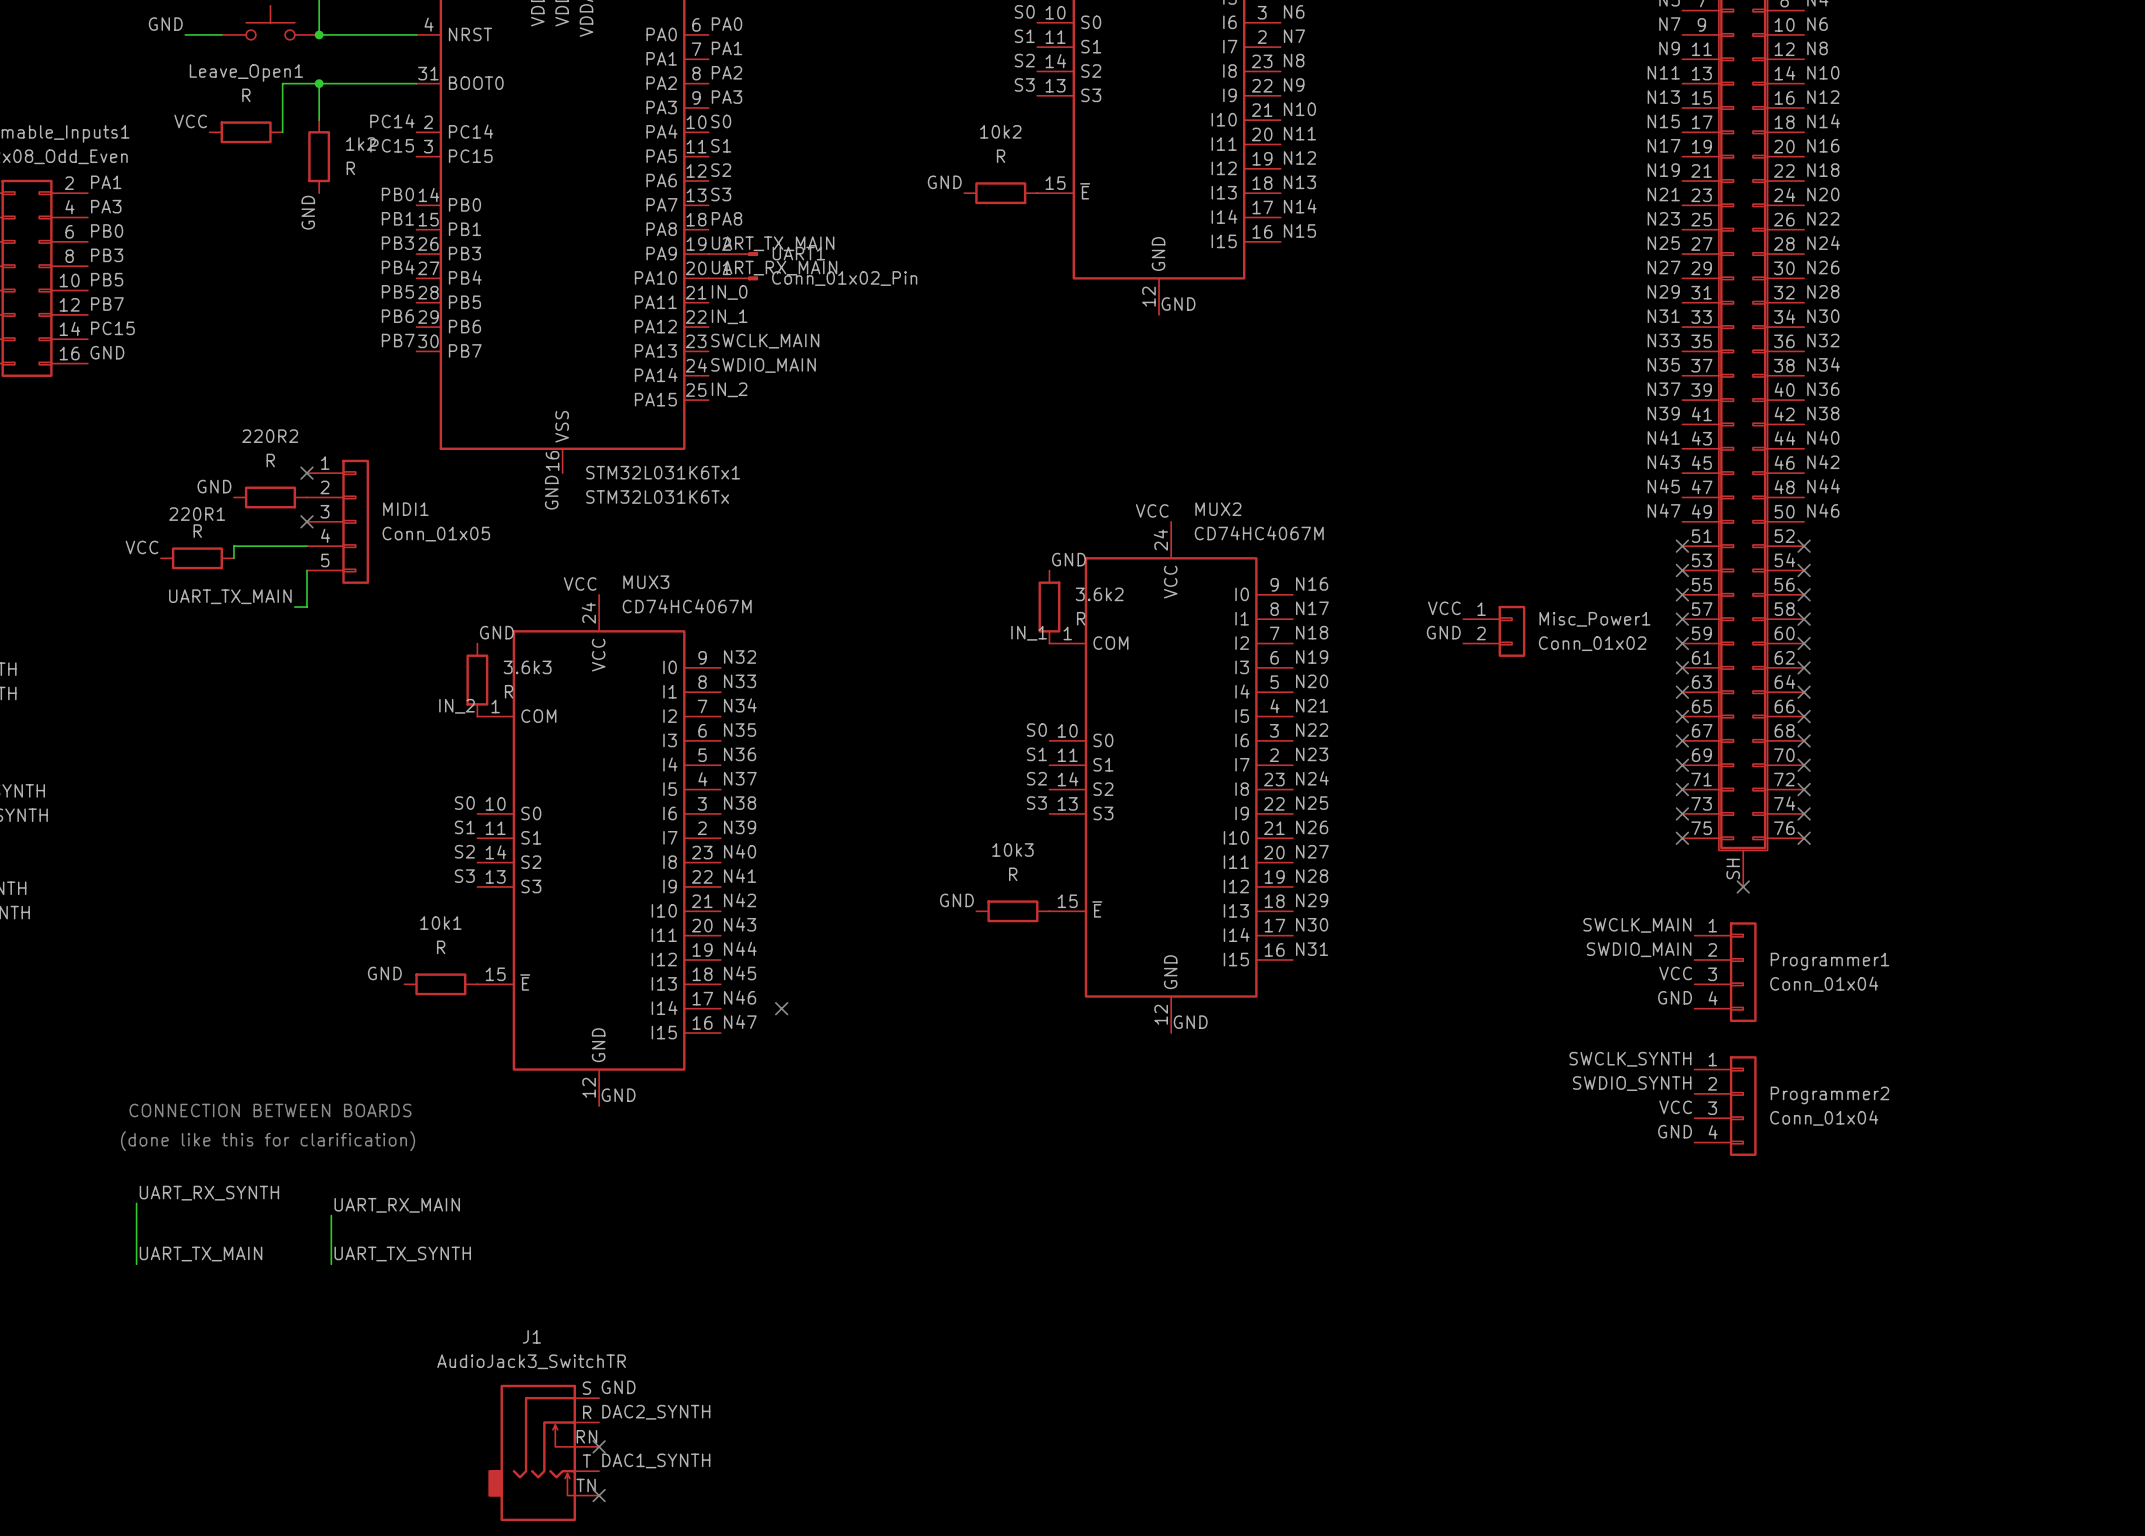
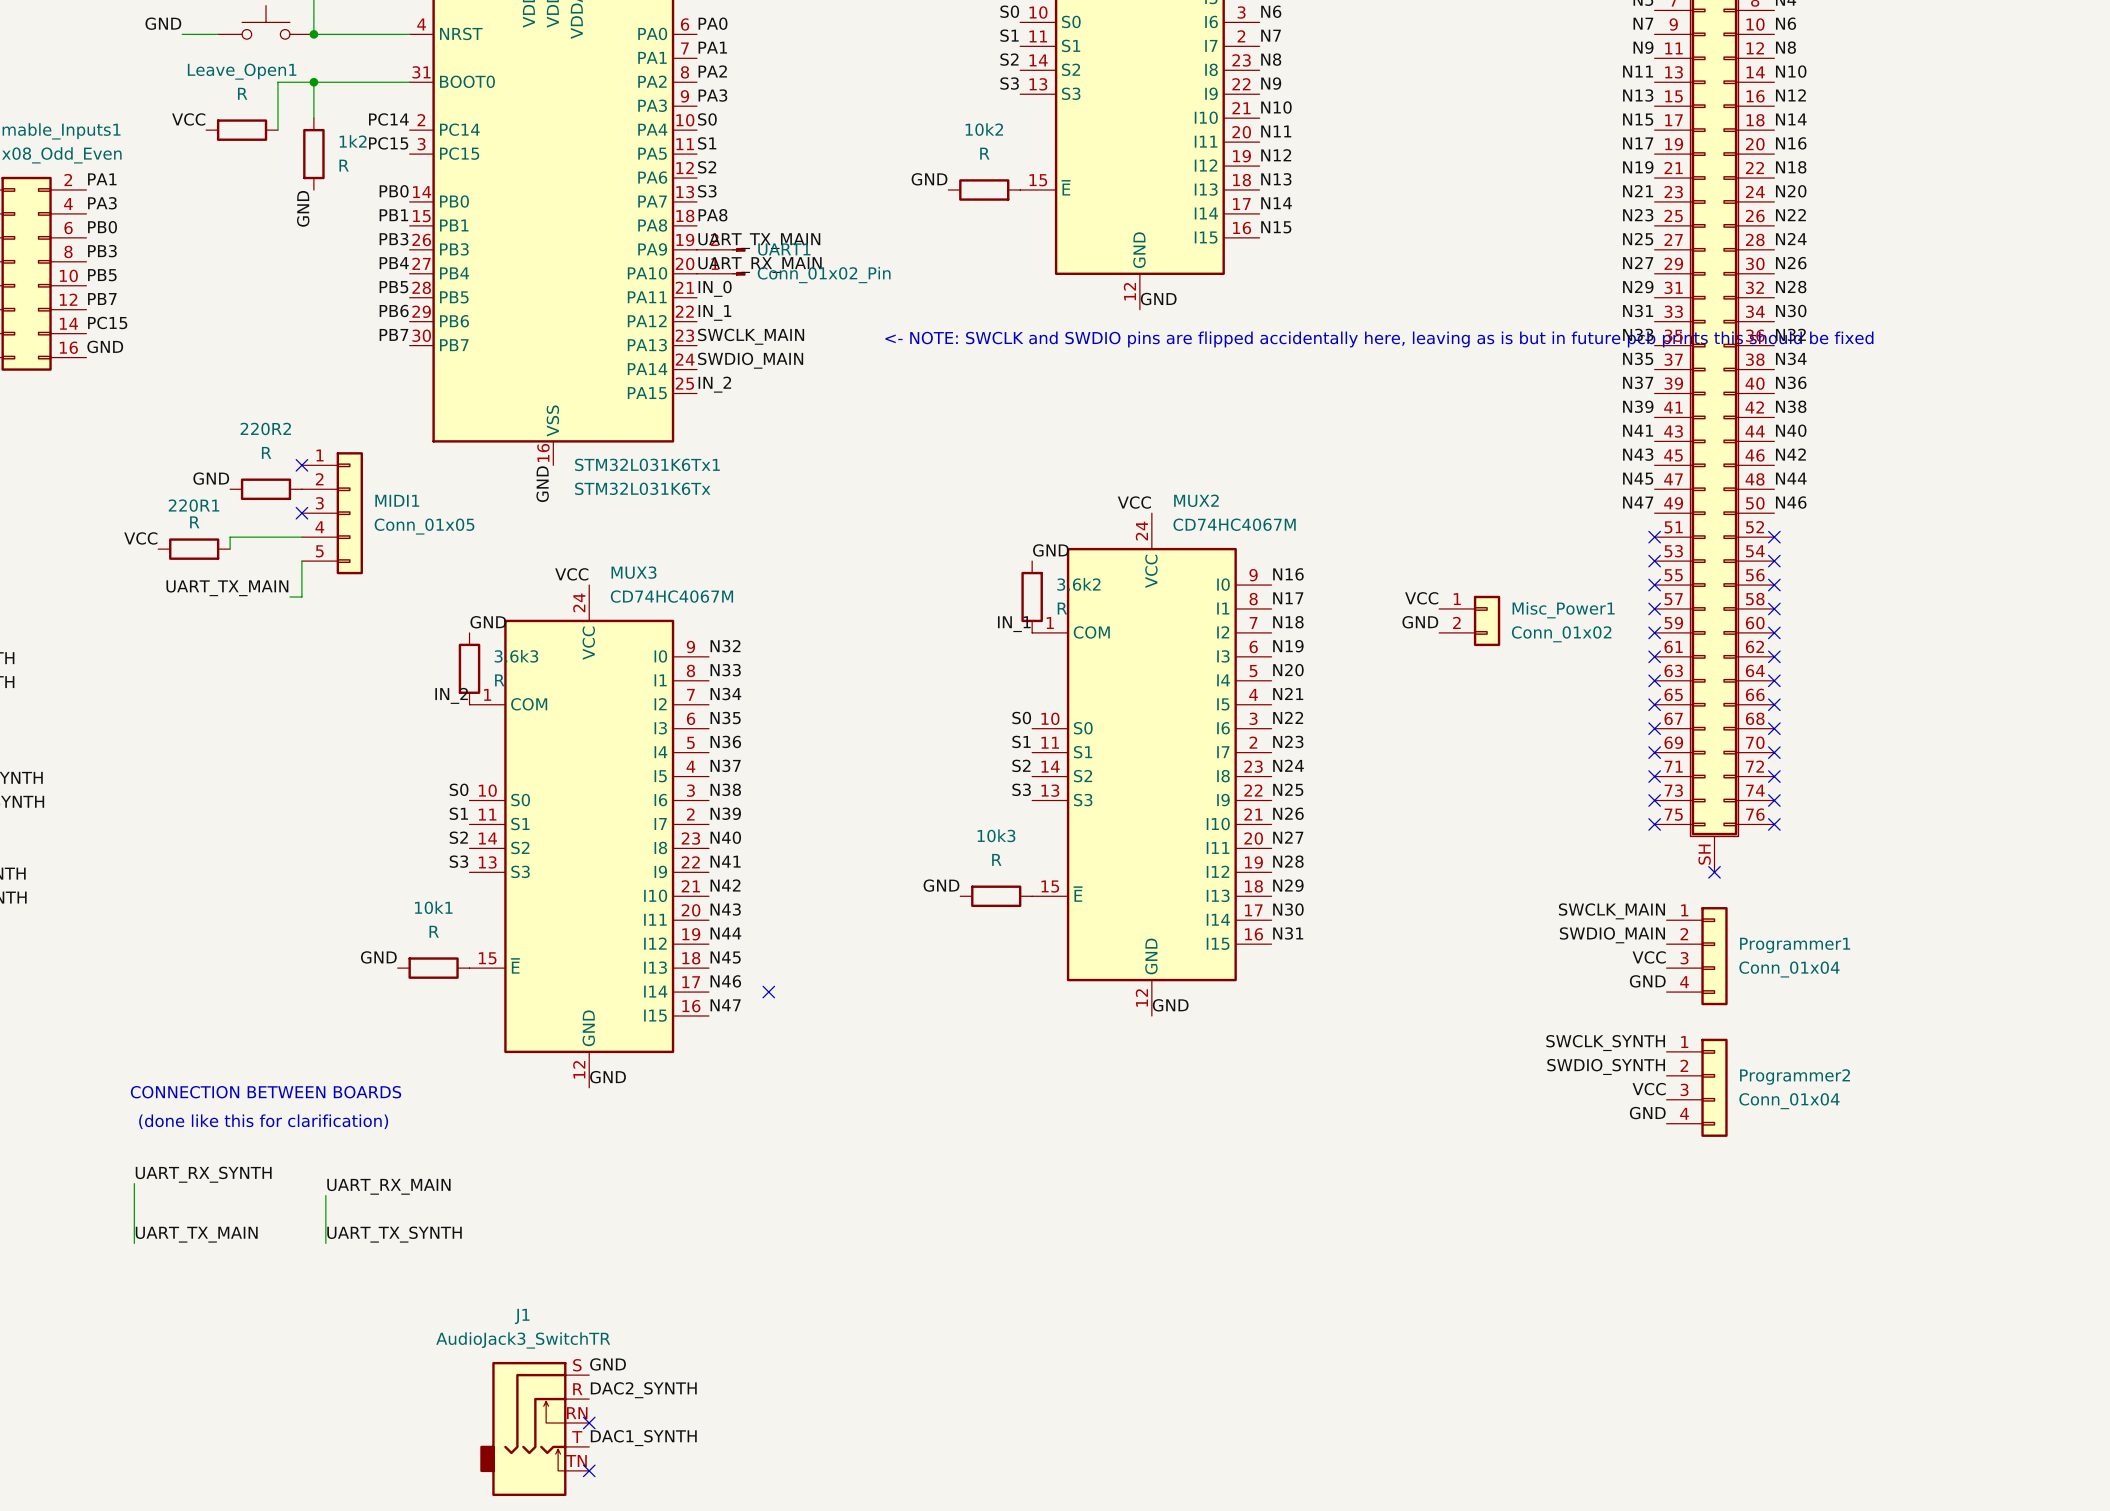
text: none -> <- NOTE: SWCLK and SWDIO pins are flipped accidentally here, leaving as is but in future pcb prints this should be fixed (1379, 339)

